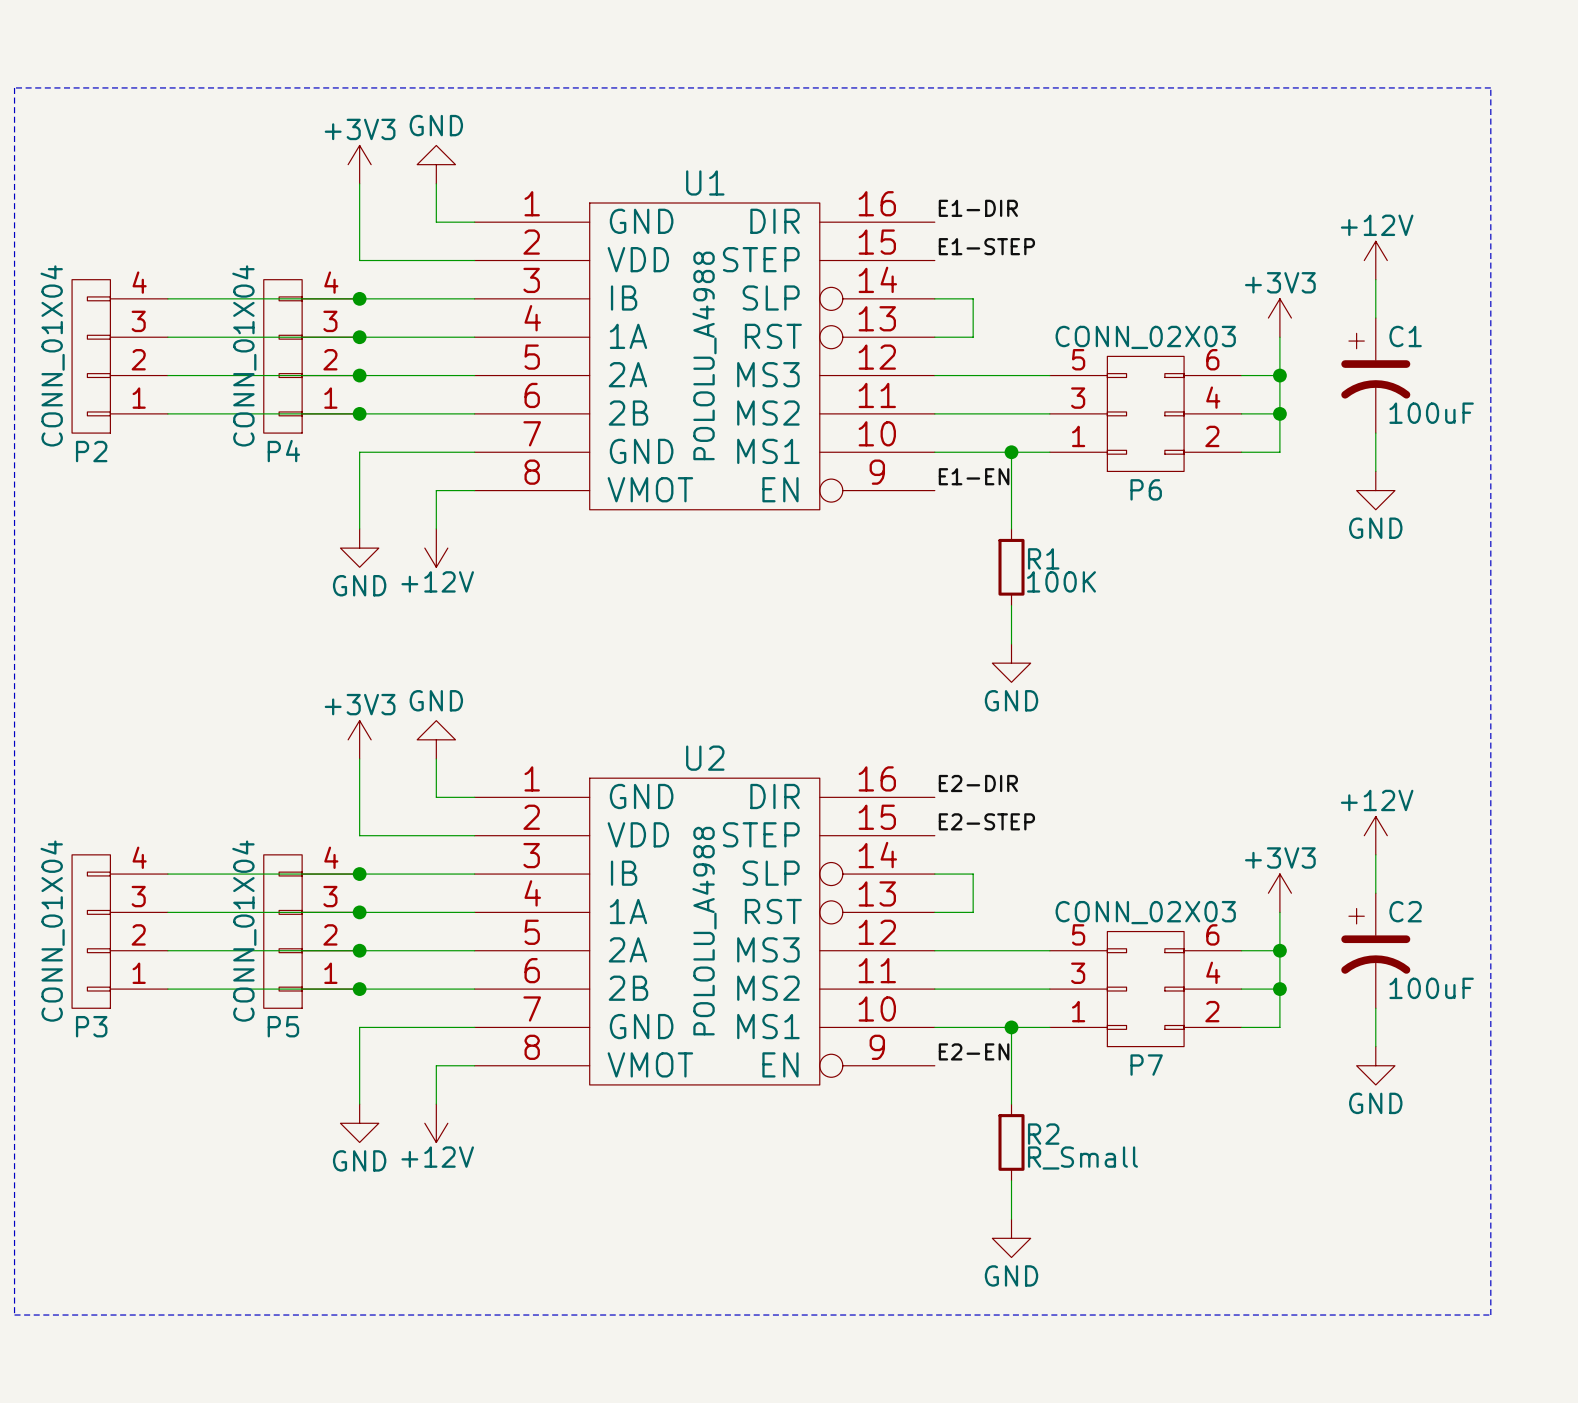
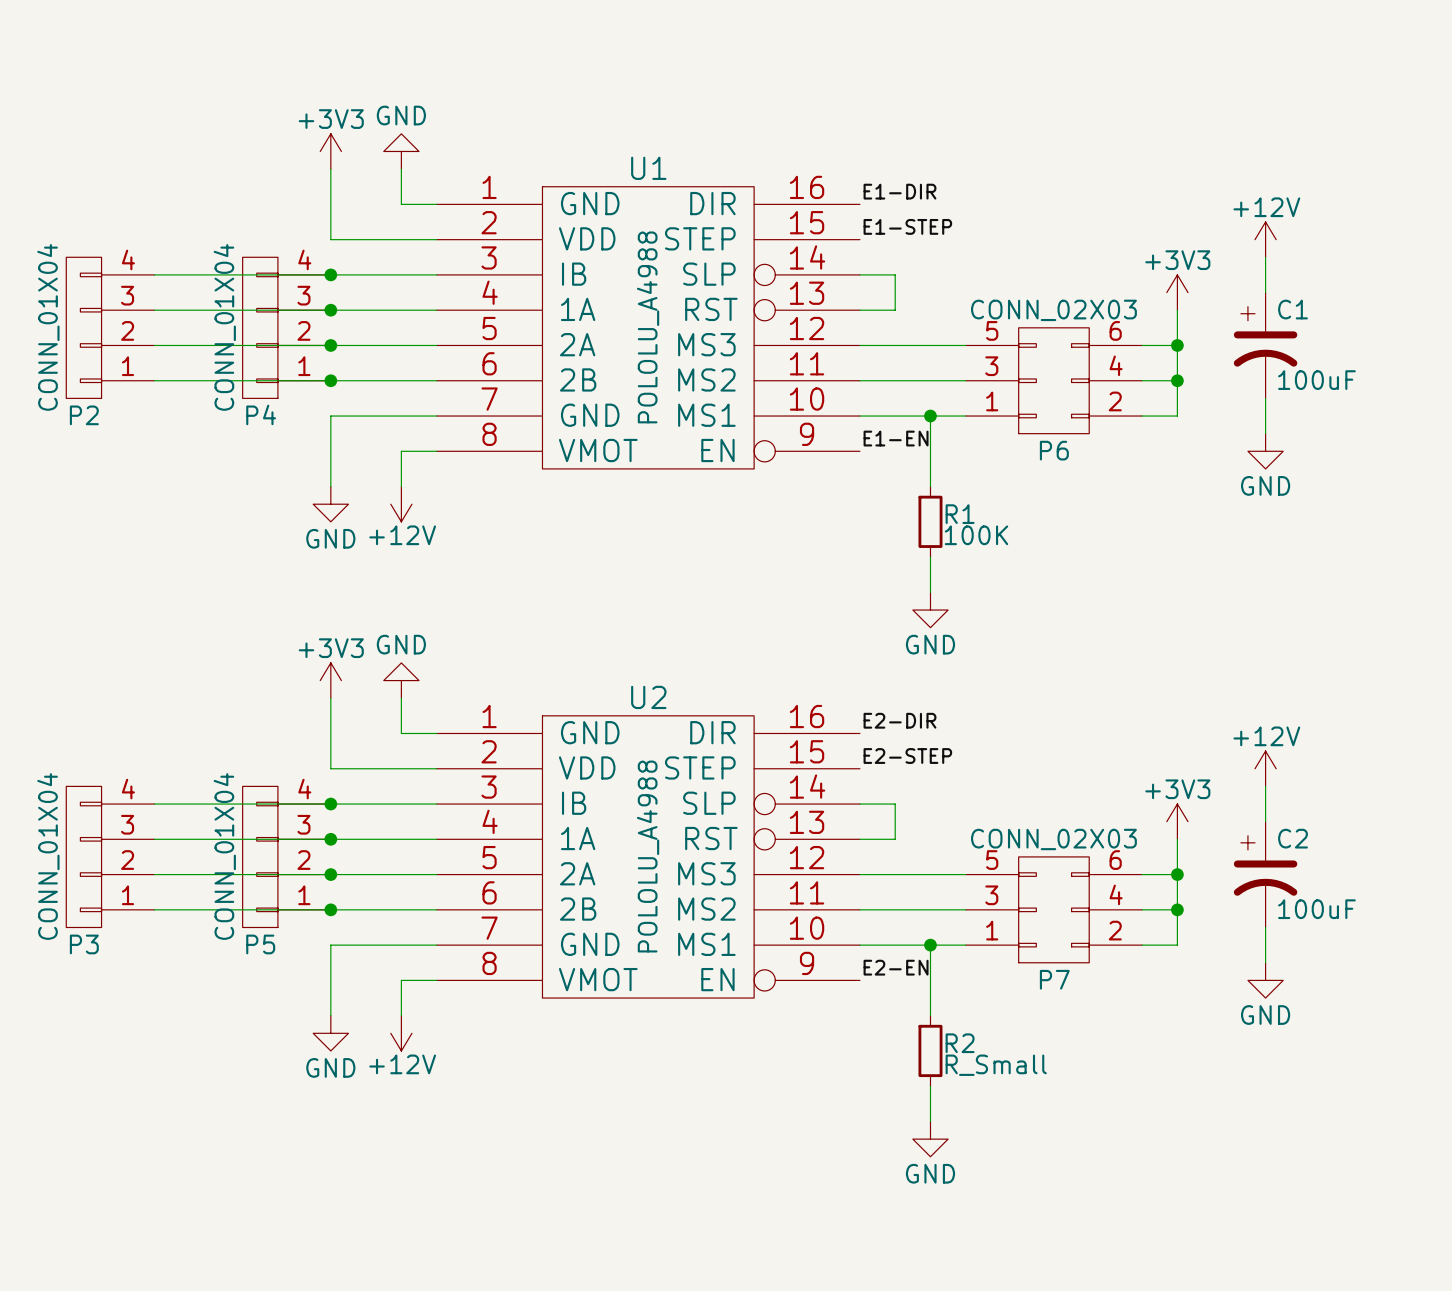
line: (14, 87) (14, 1315) (1490, 1315) (1490, 87) (14, 87) -> none

